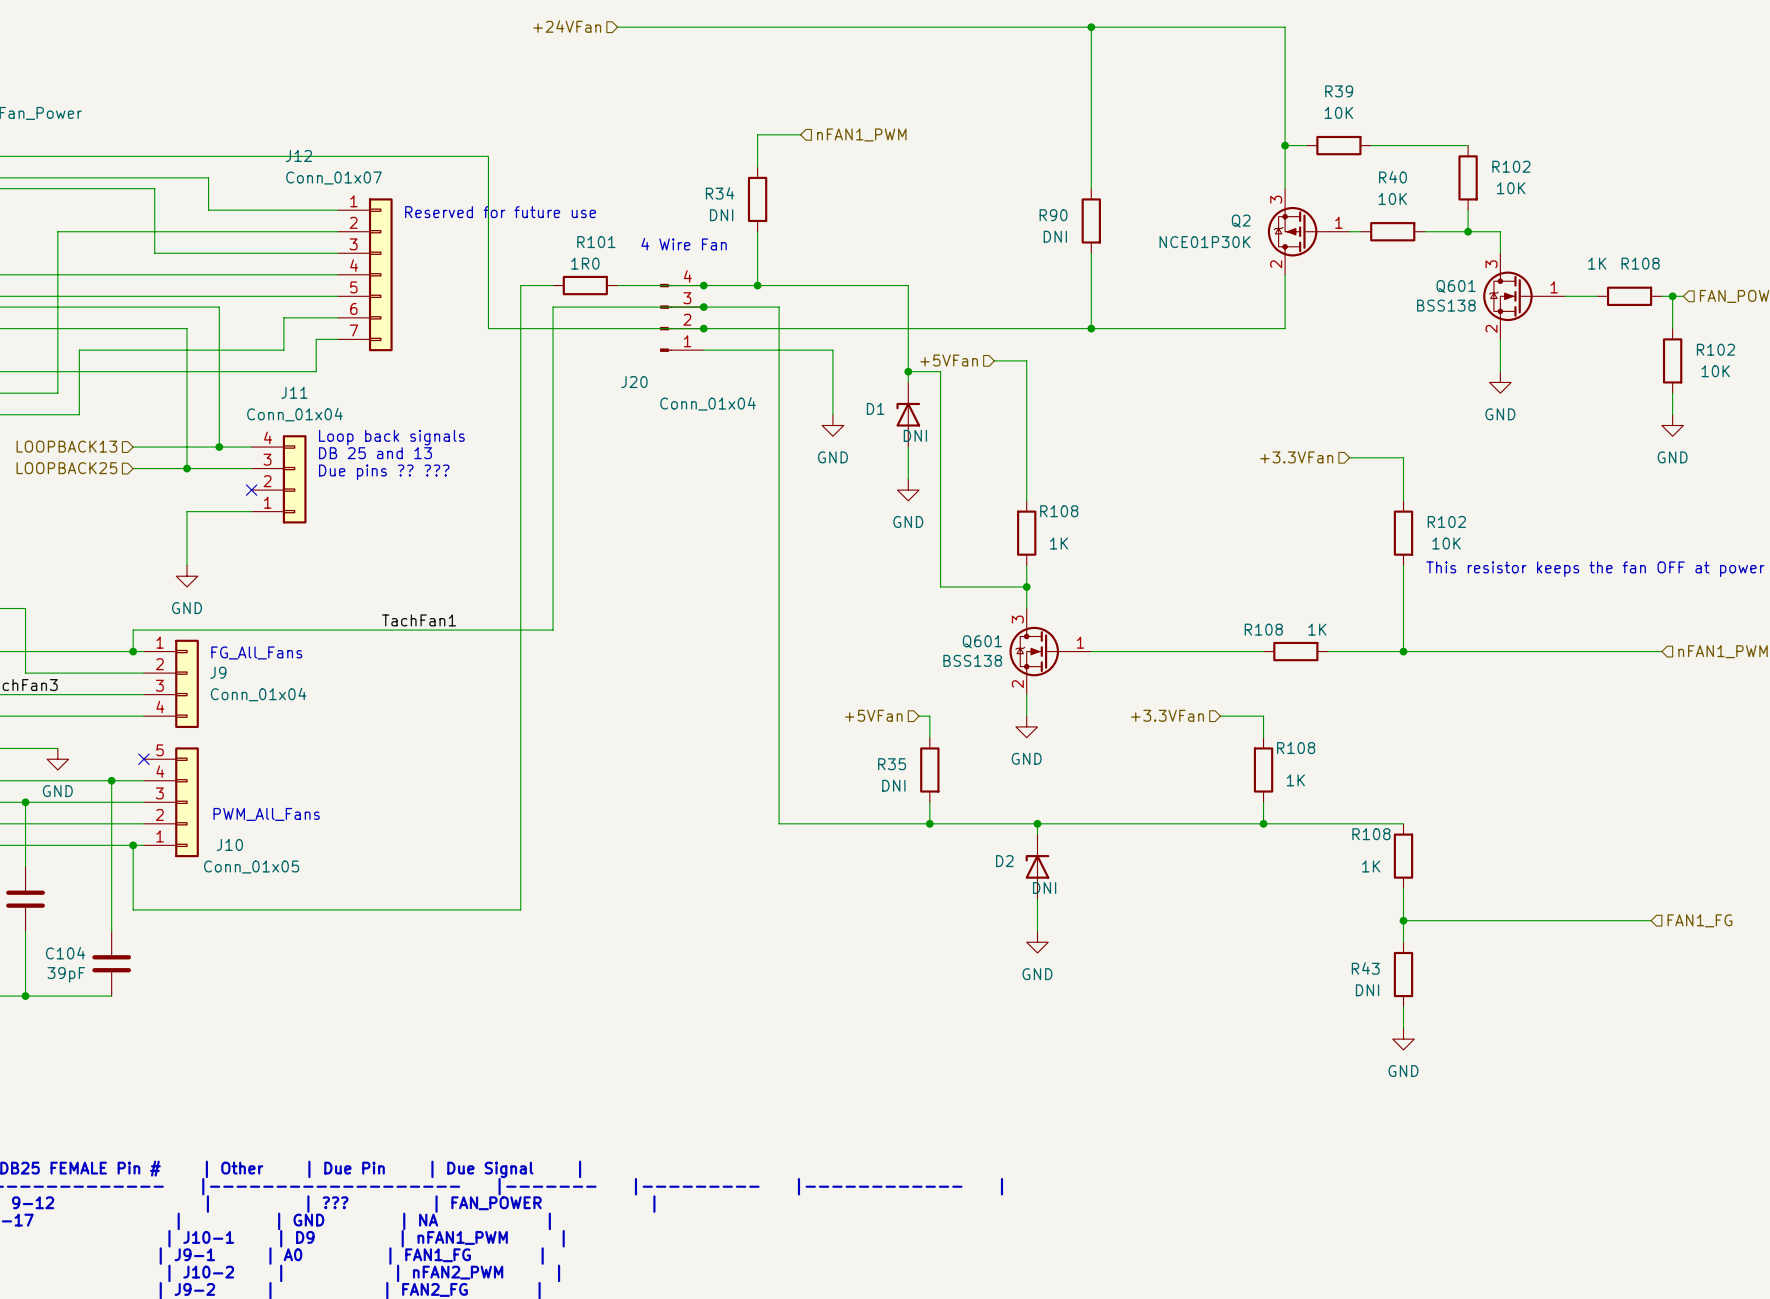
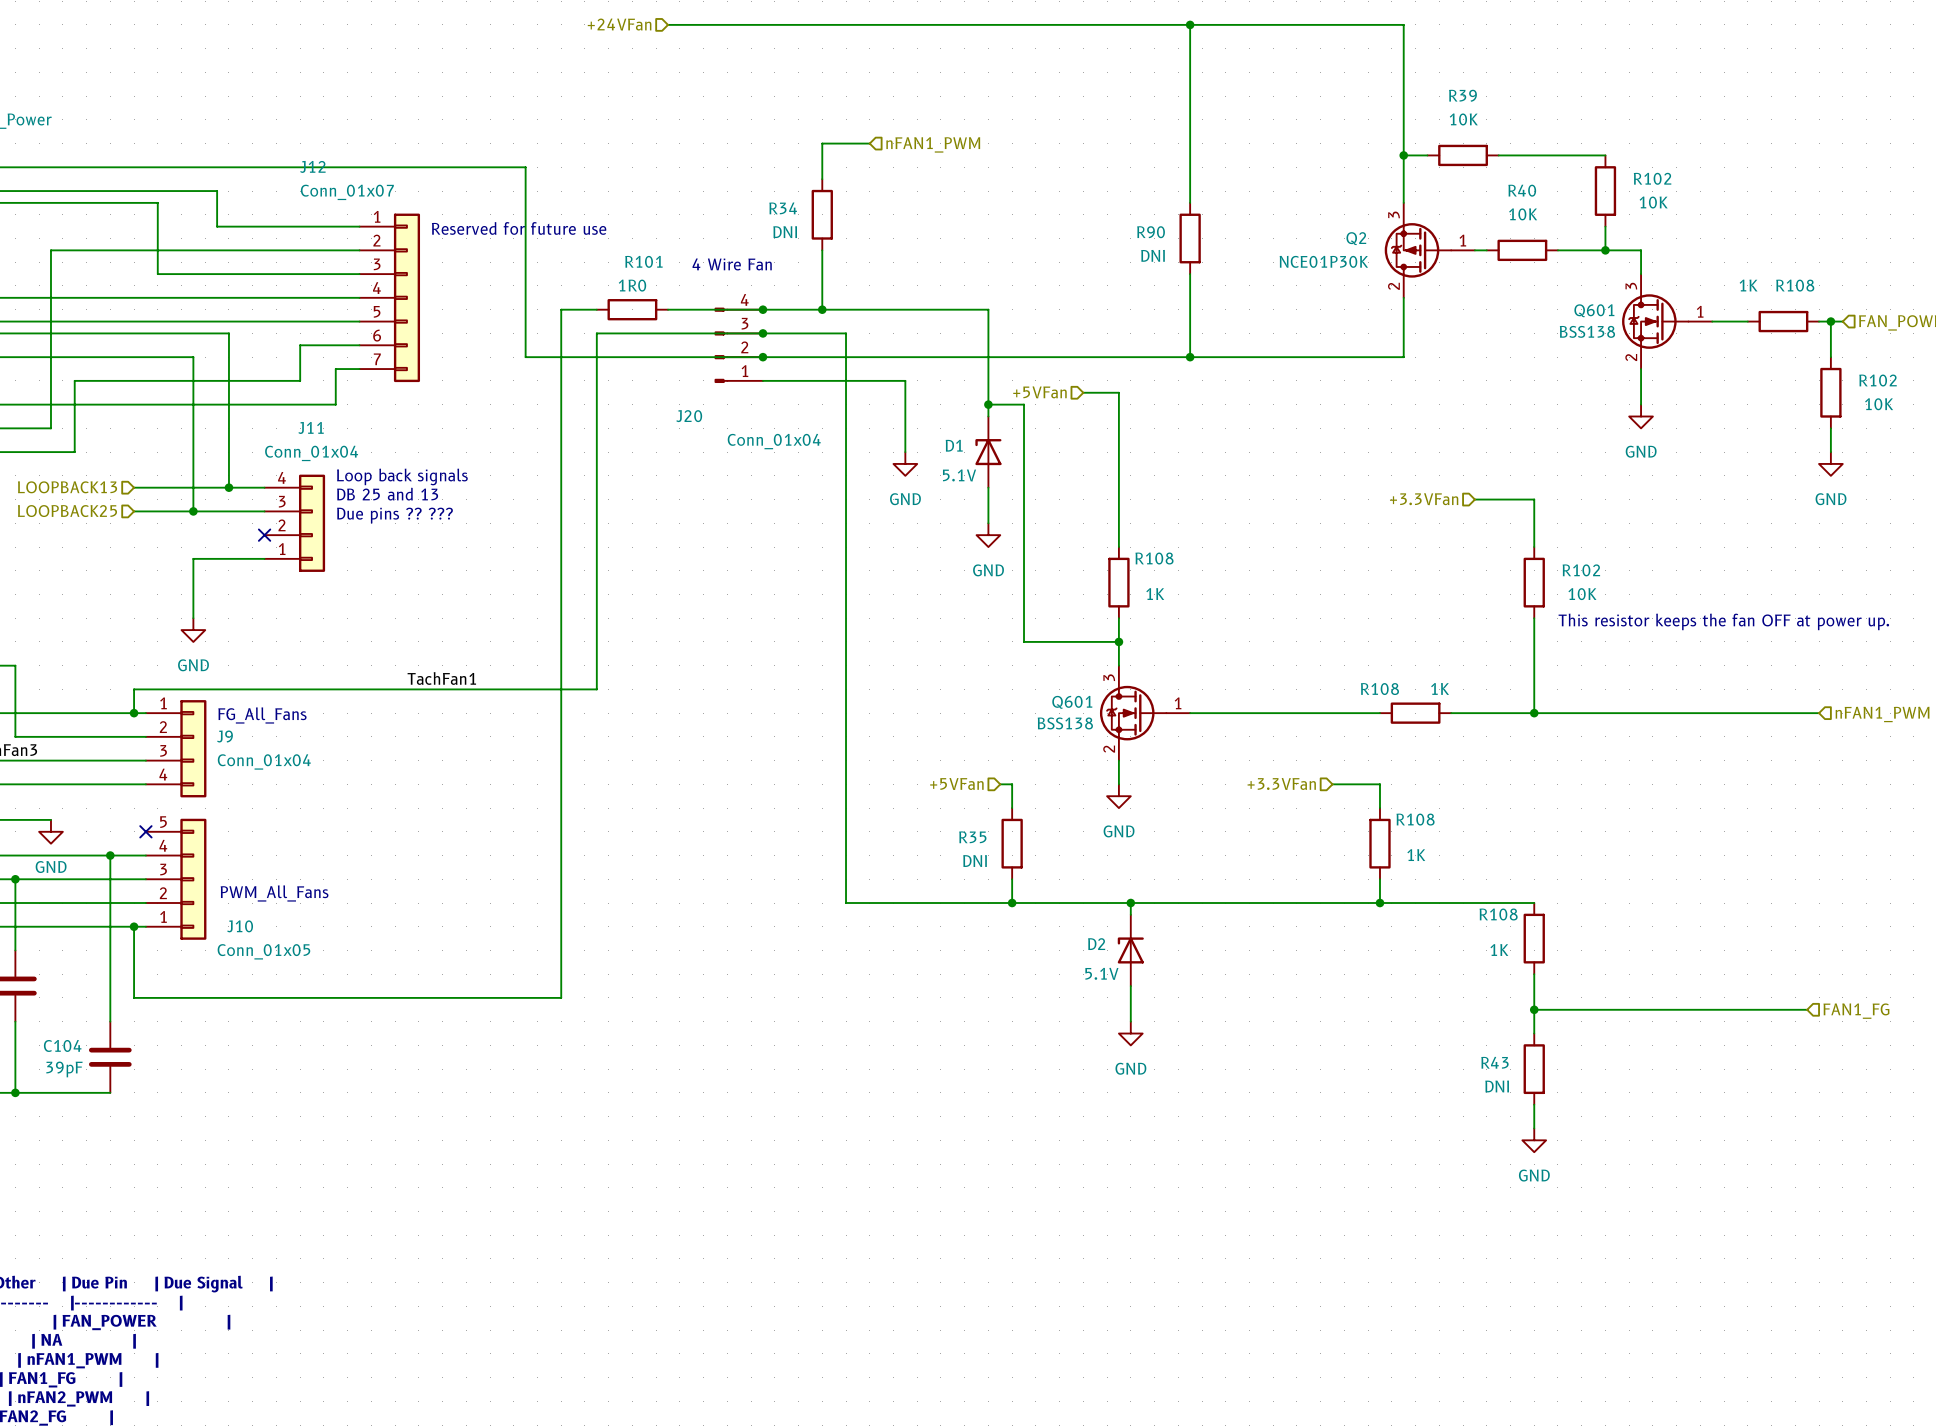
D1 value: DNI (915, 435) -> 5.1V (959, 475)
D2 value: DNI (1044, 888) -> 5.1V (1101, 973)

